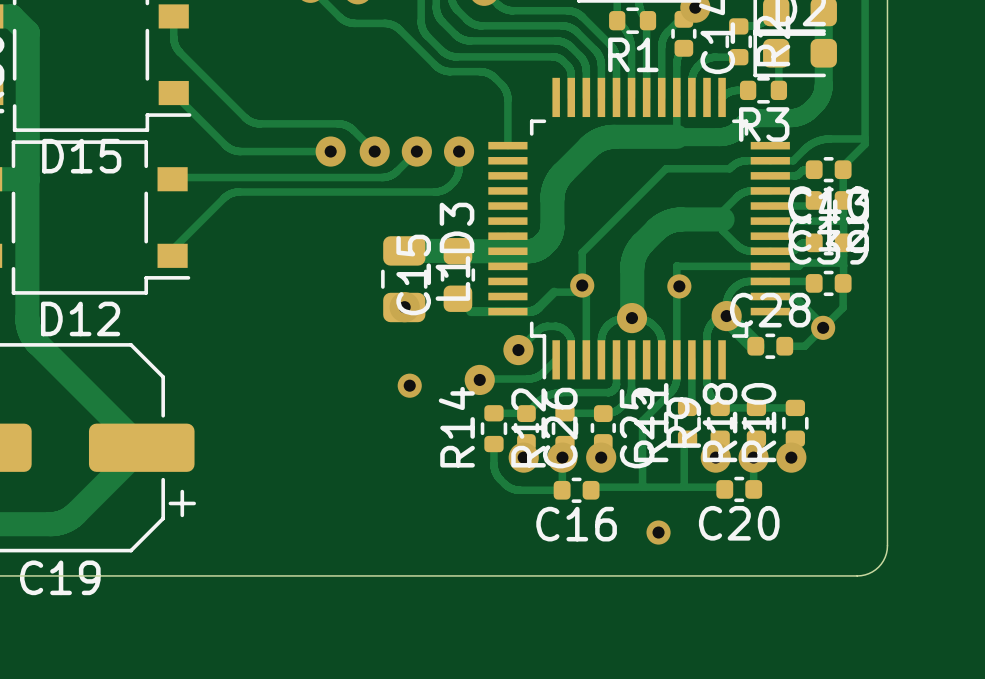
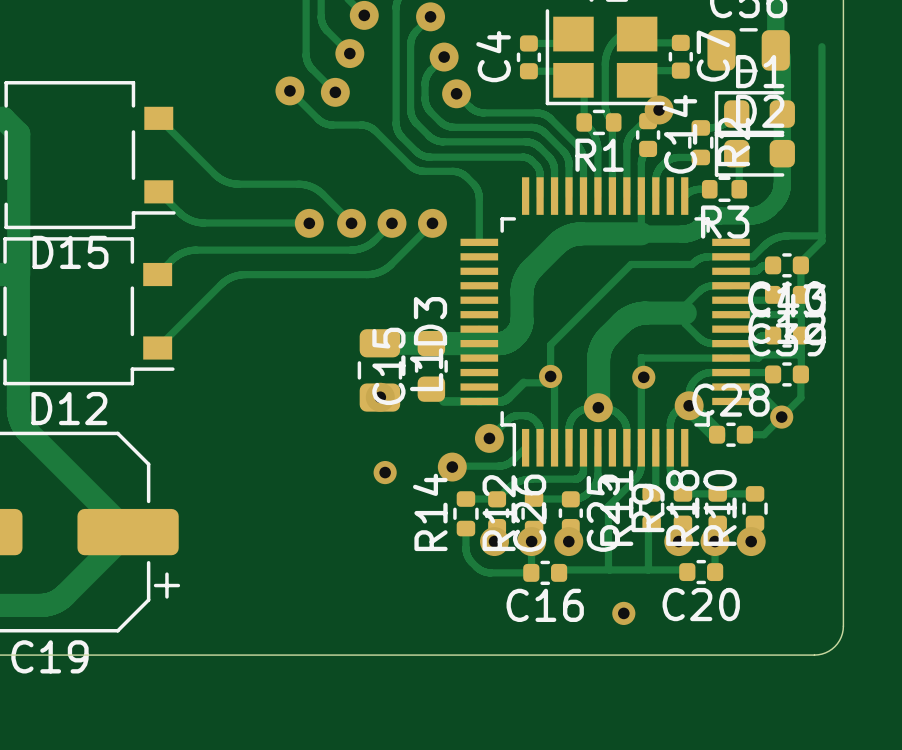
track: (173, 16) (173, 40) (178, 50) (248, 120) (259, 123) (343, 124) (351, 128) (374, 151) -> (158, 118) (222, 180) (237, 184) (300, 184) (310, 186) (321, 193) (351, 223)
track: (173, 93) (226, 145) (233, 150) (330, 151) -> (158, 191) (182, 215) (197, 222) (312, 223)
via position: (330, 151) -> (309, 223)
via position: (374, 151) -> (351, 223)
track: (416, 151) (395, 172) (383, 177) (174, 177) -> (391, 223) (371, 243) (357, 249) (193, 250) (177, 256) (159, 272)
via position: (416, 151) -> (391, 223)
track: (459, 151) (456, 177) (448, 187) (439, 191) (231, 193) (224, 197) (172, 249) (172, 255) -> (432, 223) (390, 265) (375, 273) (243, 274) (230, 277) (220, 284) (157, 348)
via position: (459, 151) -> (432, 223)

